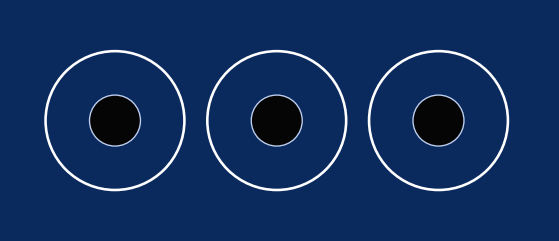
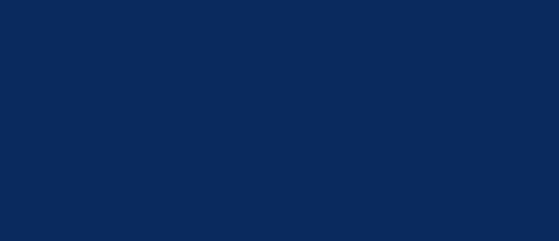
part: (114, 120) -> none
part: (276, 120) -> none
part: (438, 120) -> none

